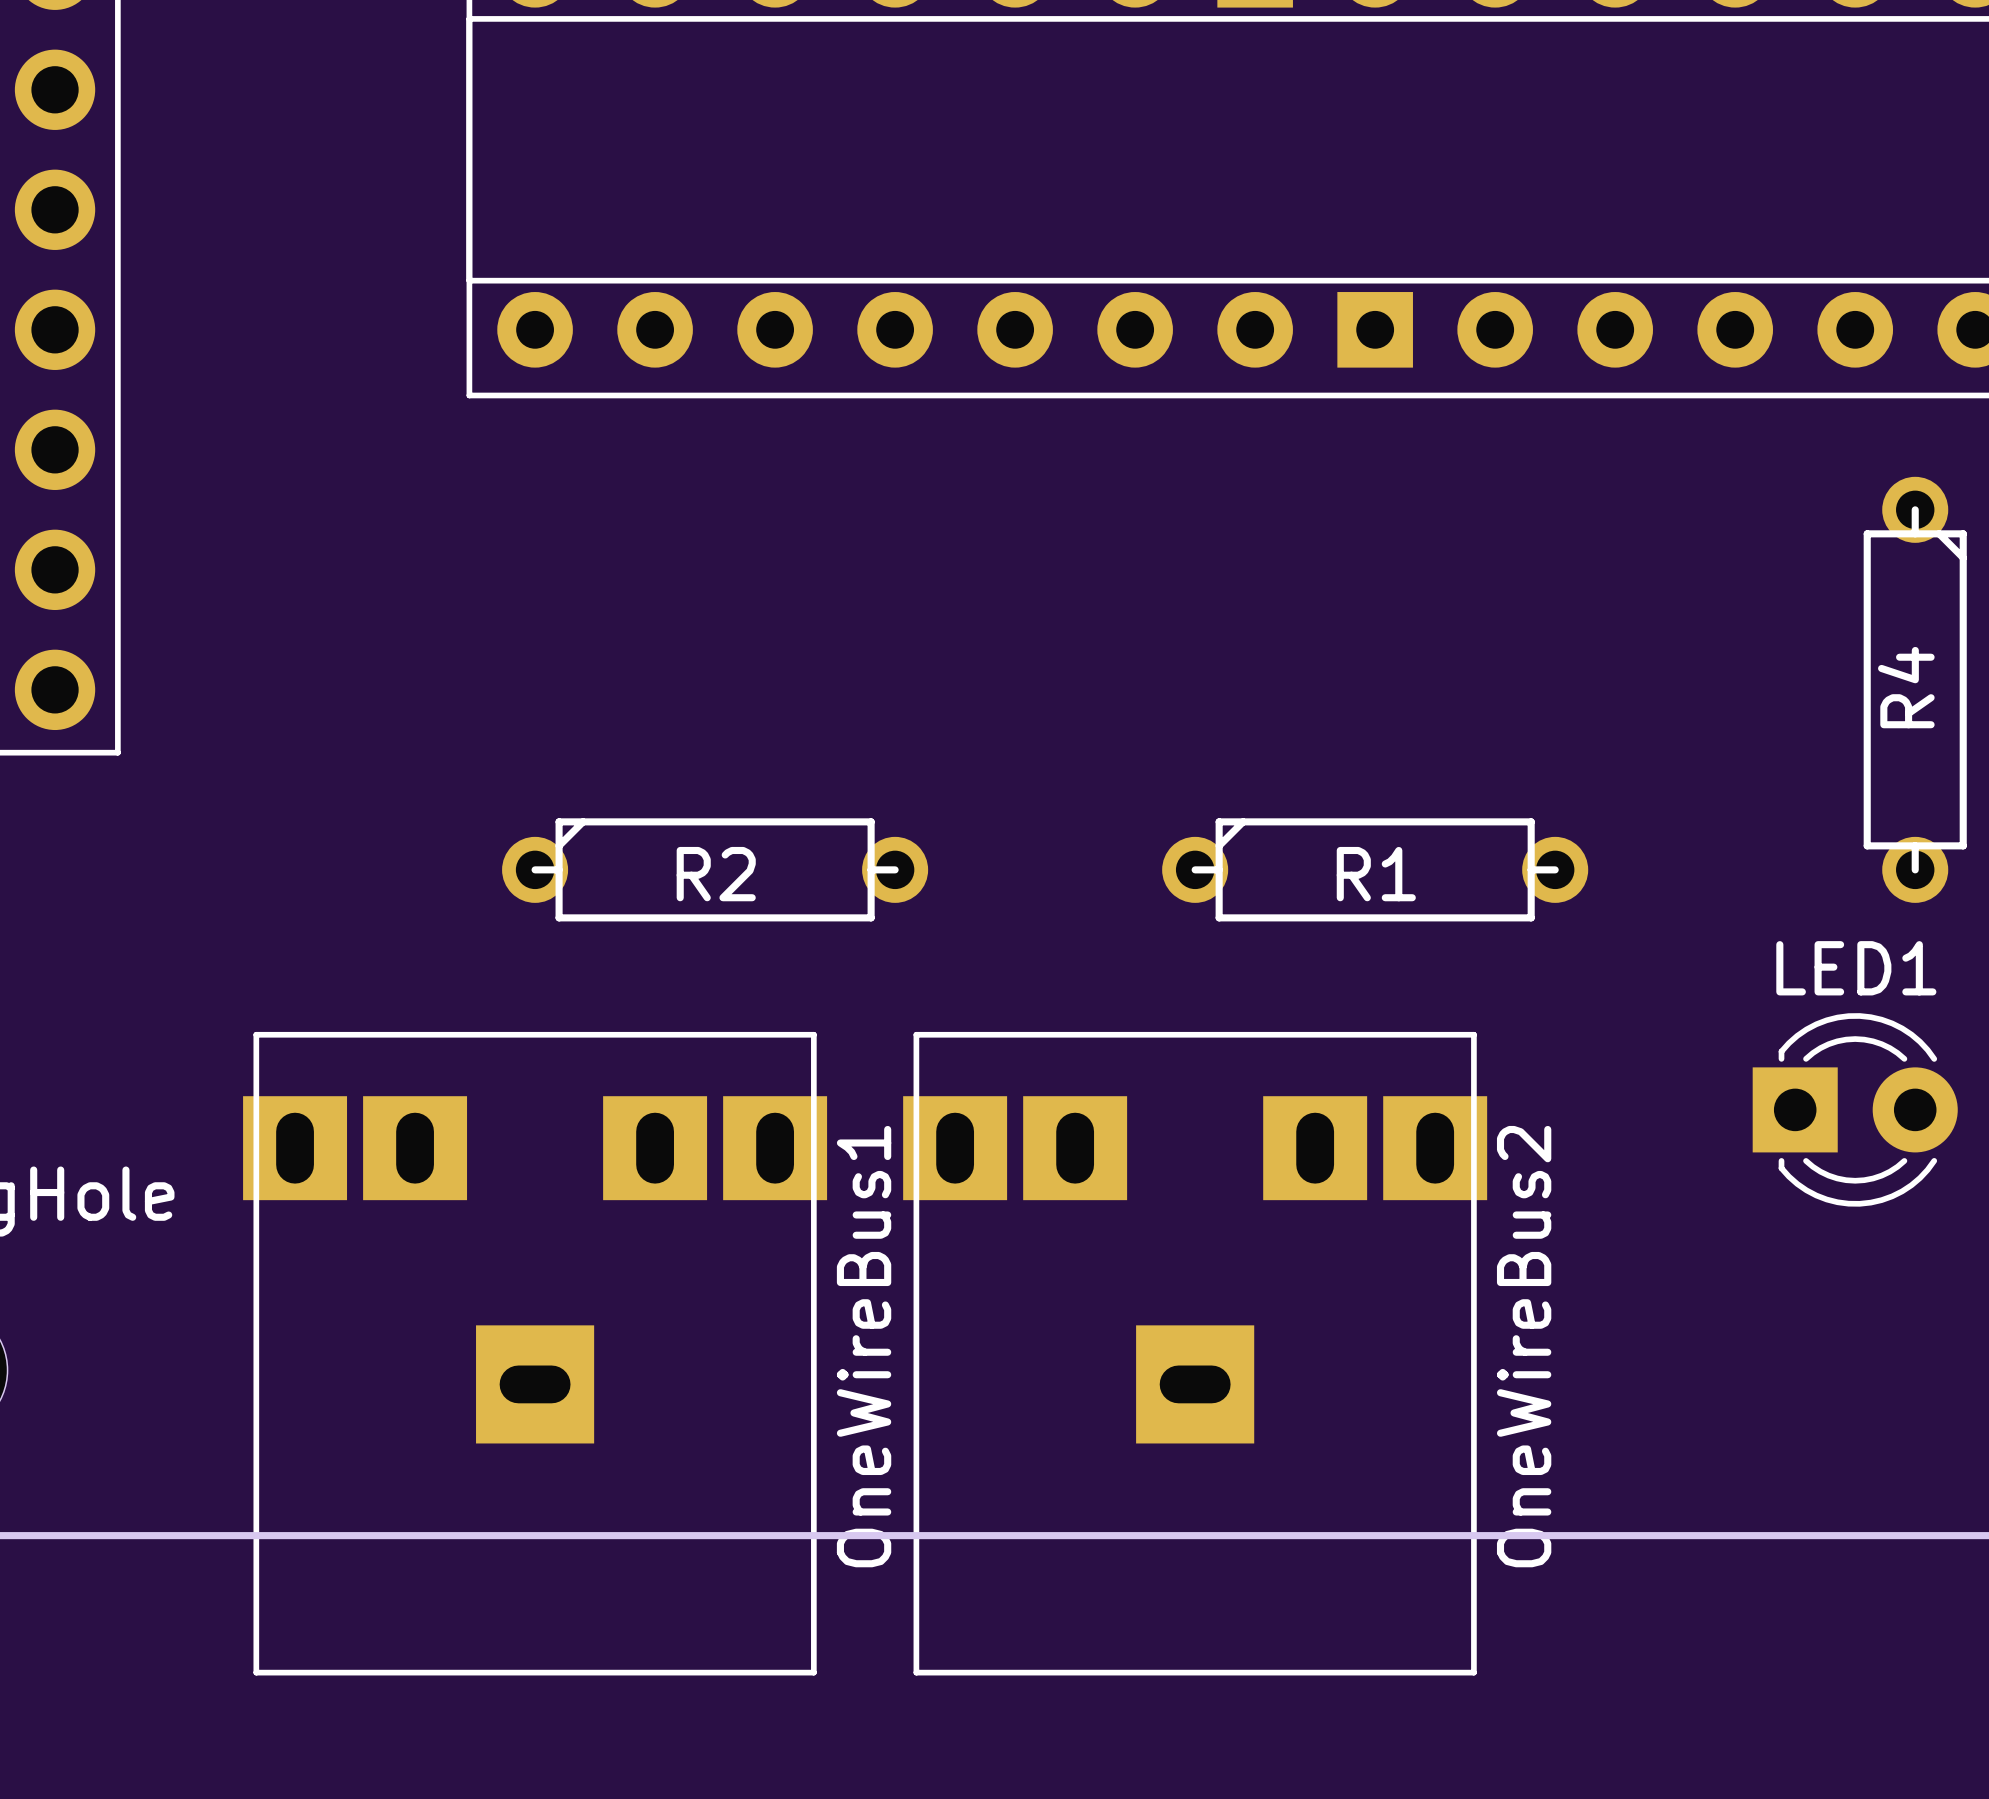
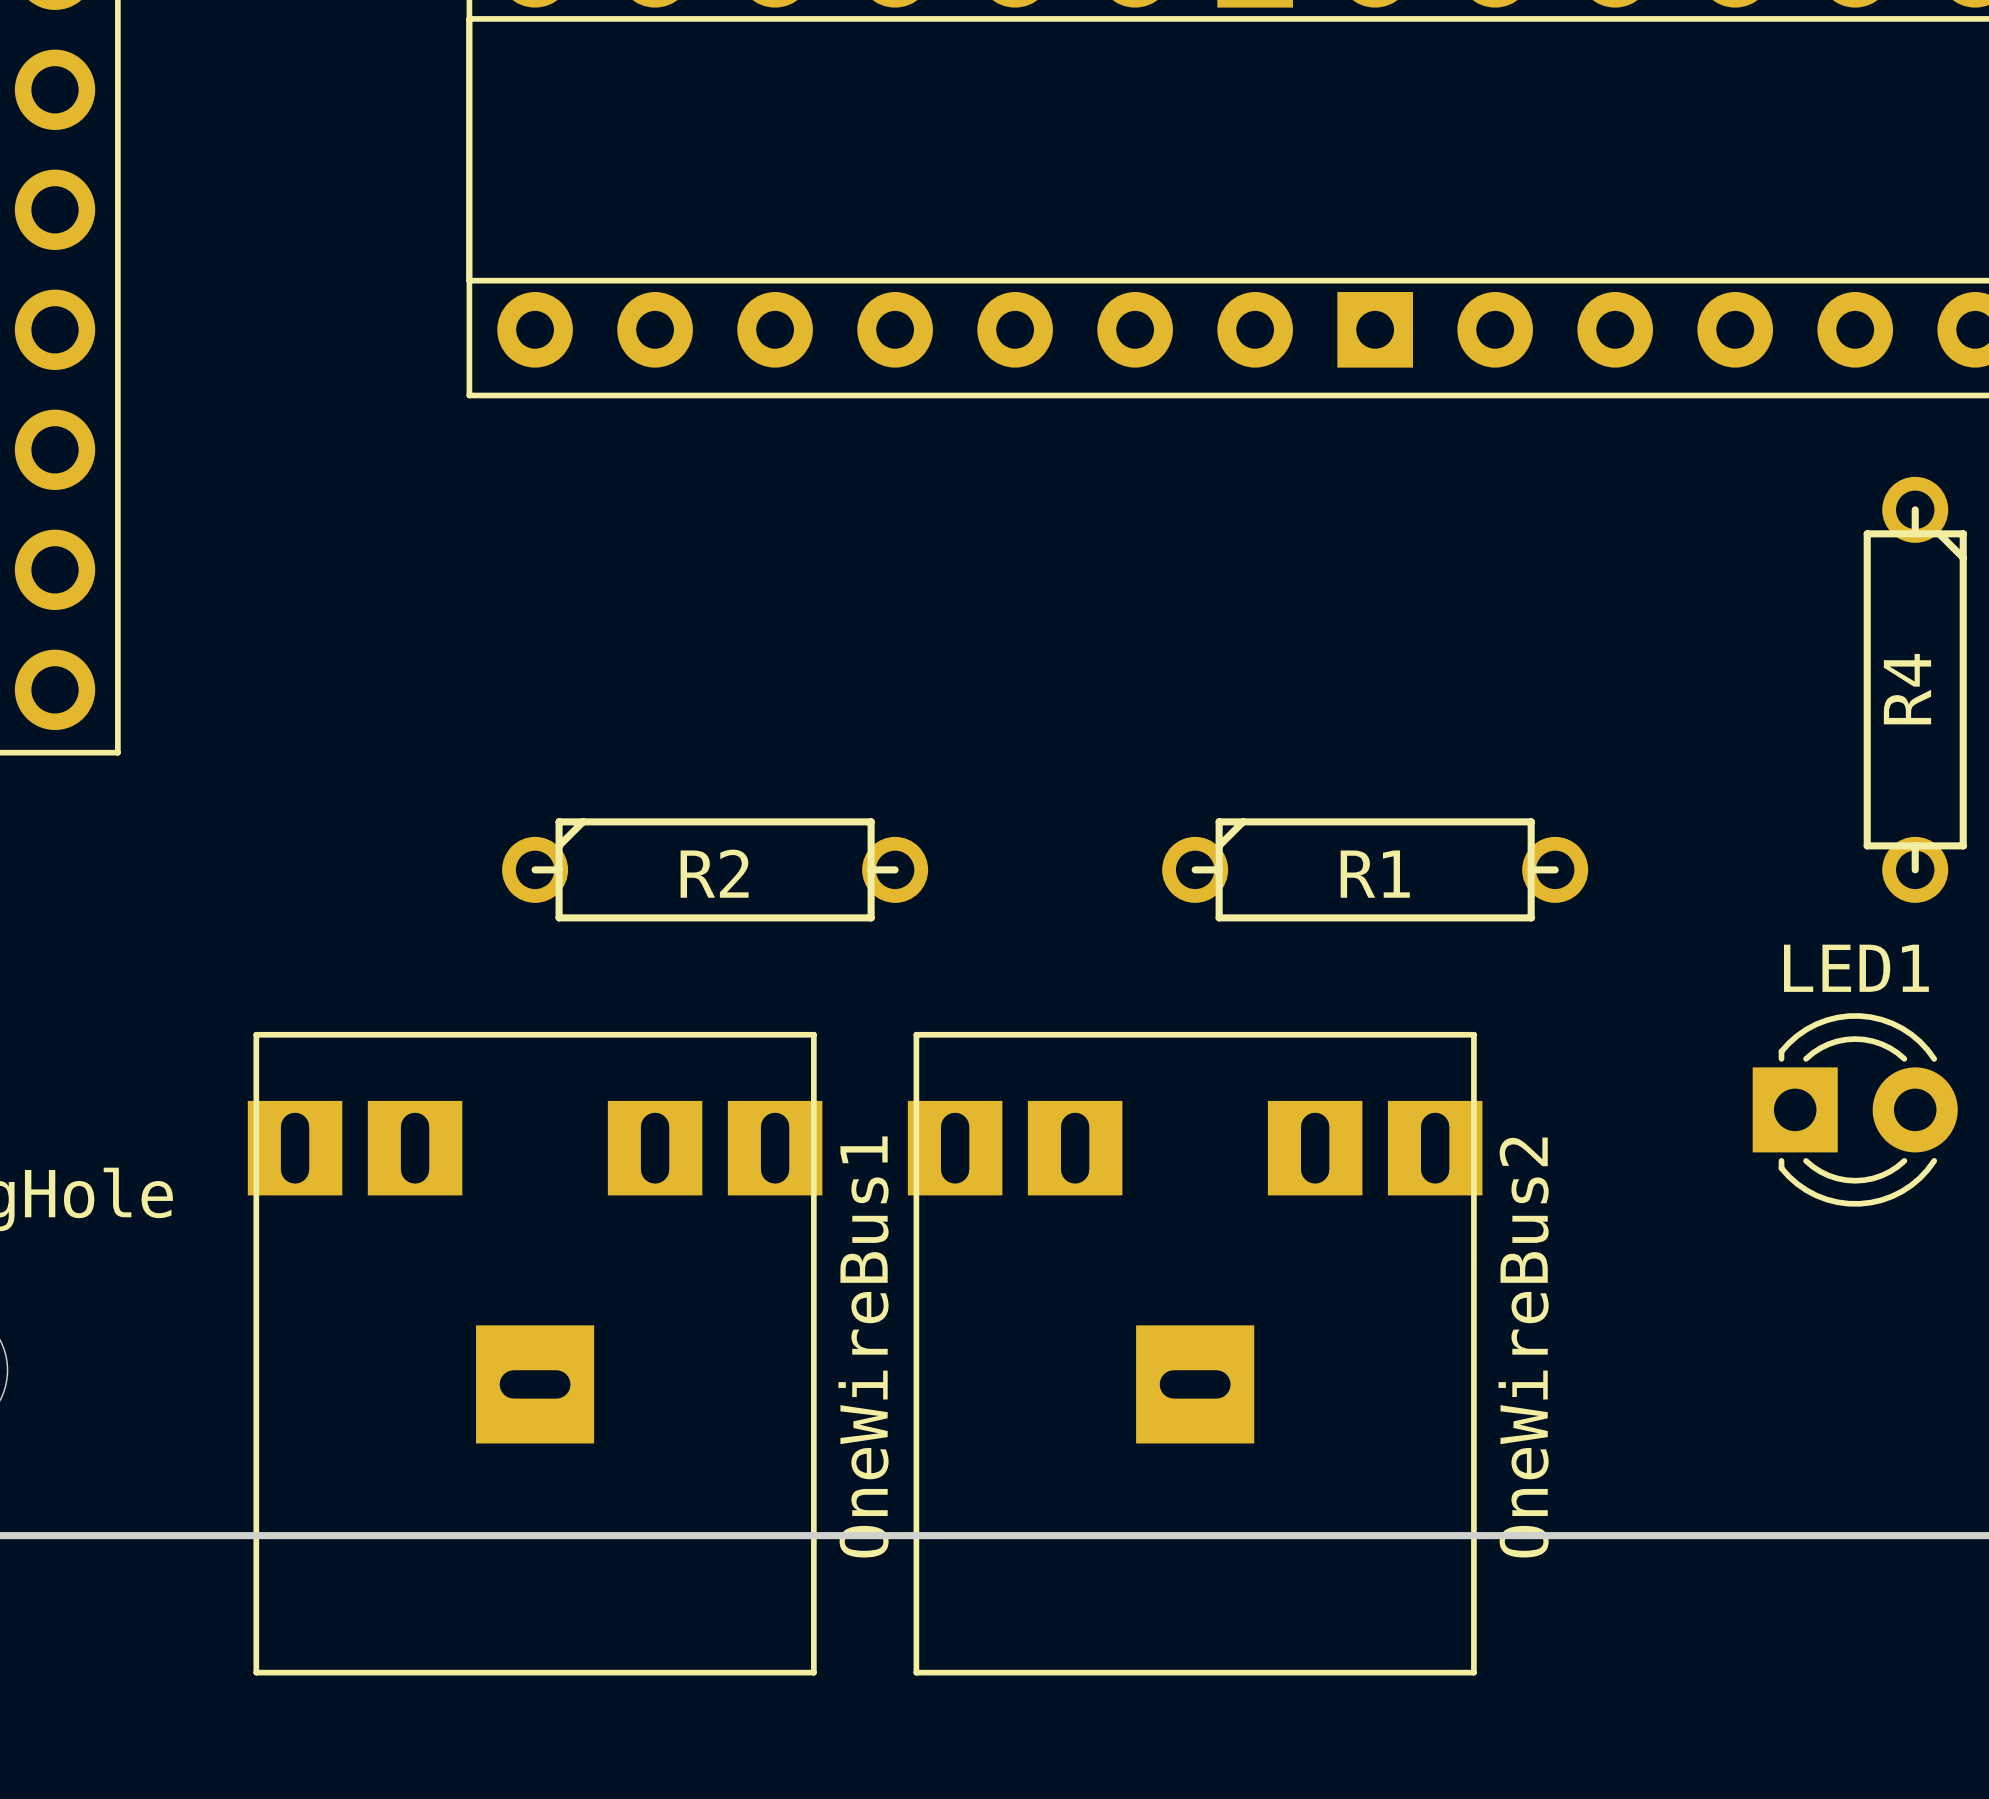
OneWireBus1 footprint: [243, 1031, 828, 1676] -> [247, 1031, 823, 1676]
OneWireBus2 footprint: [903, 1031, 1488, 1676] -> [907, 1031, 1483, 1676]

